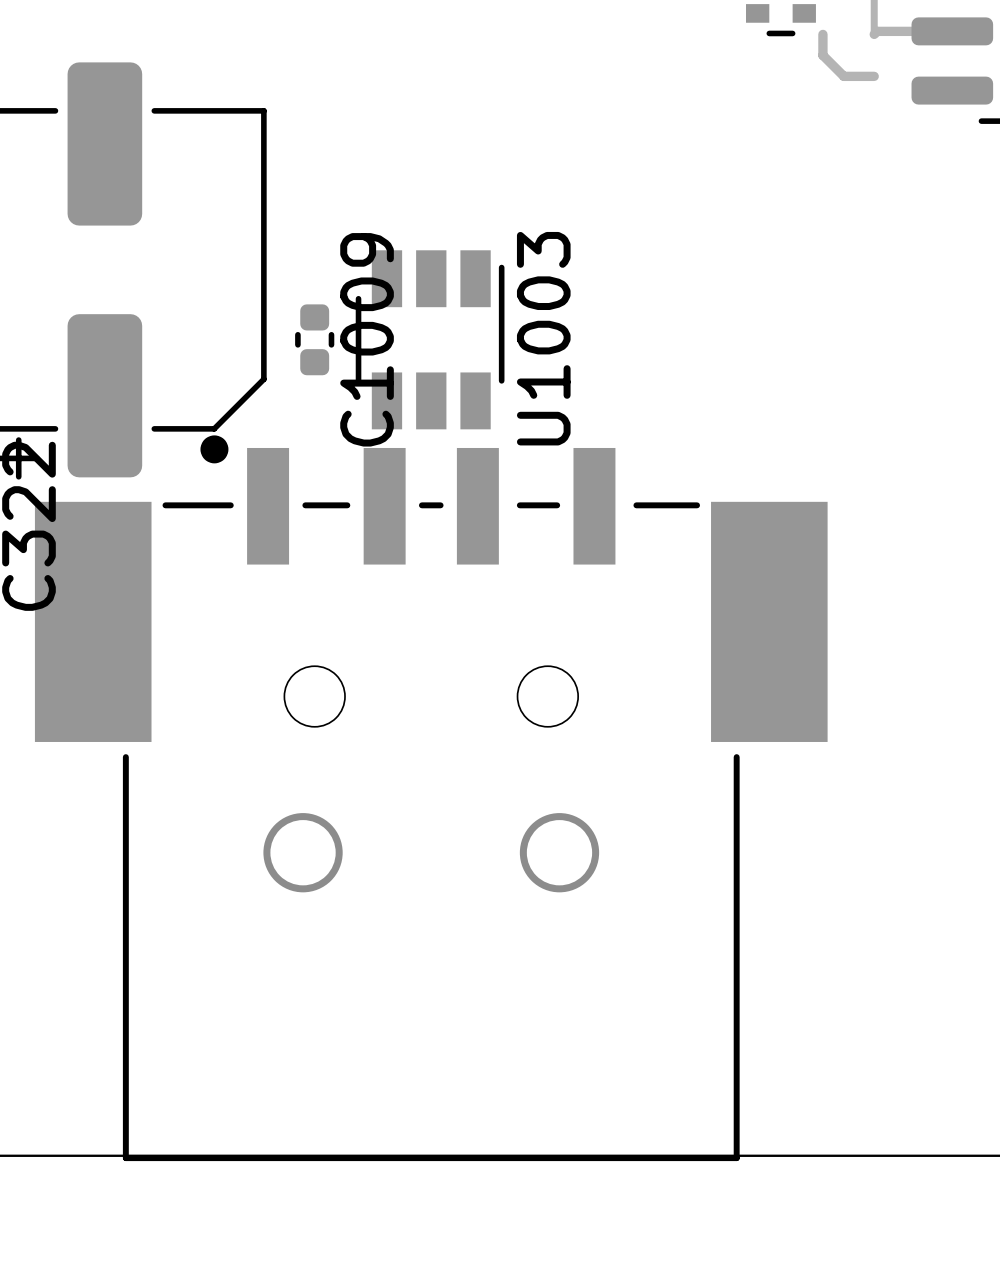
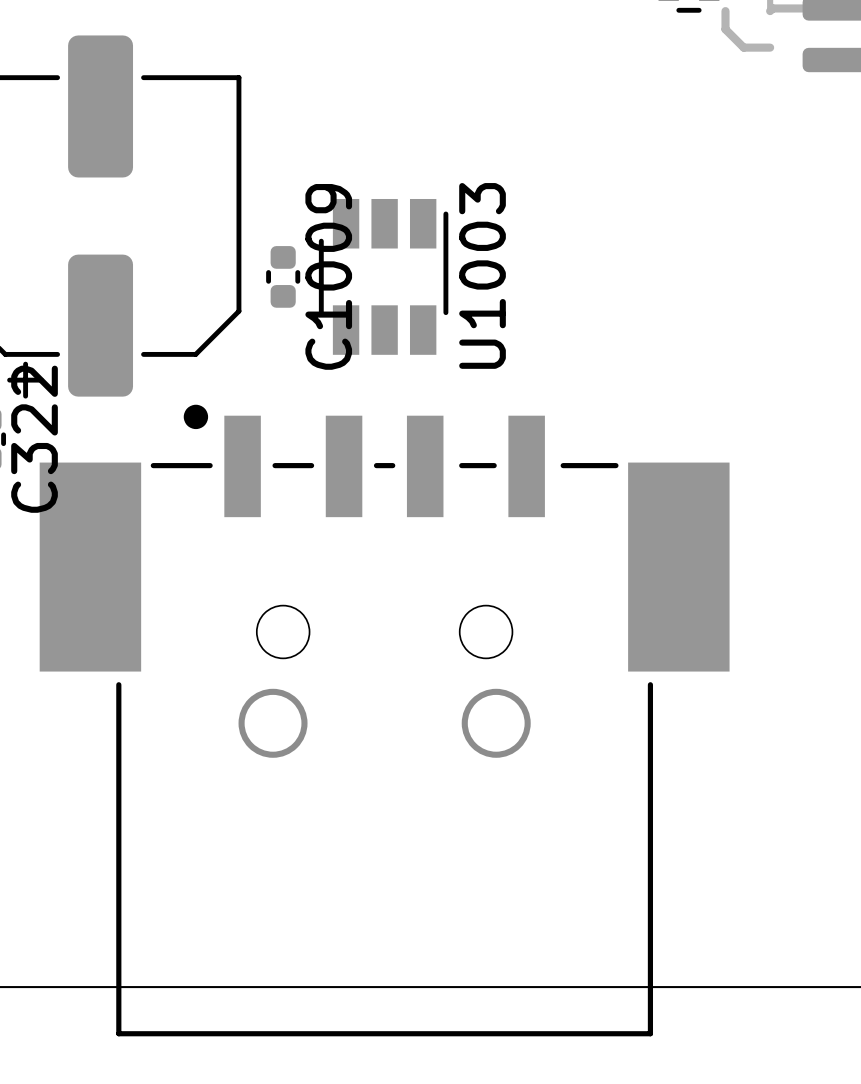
part position: (431, 798) -> (384, 720)

